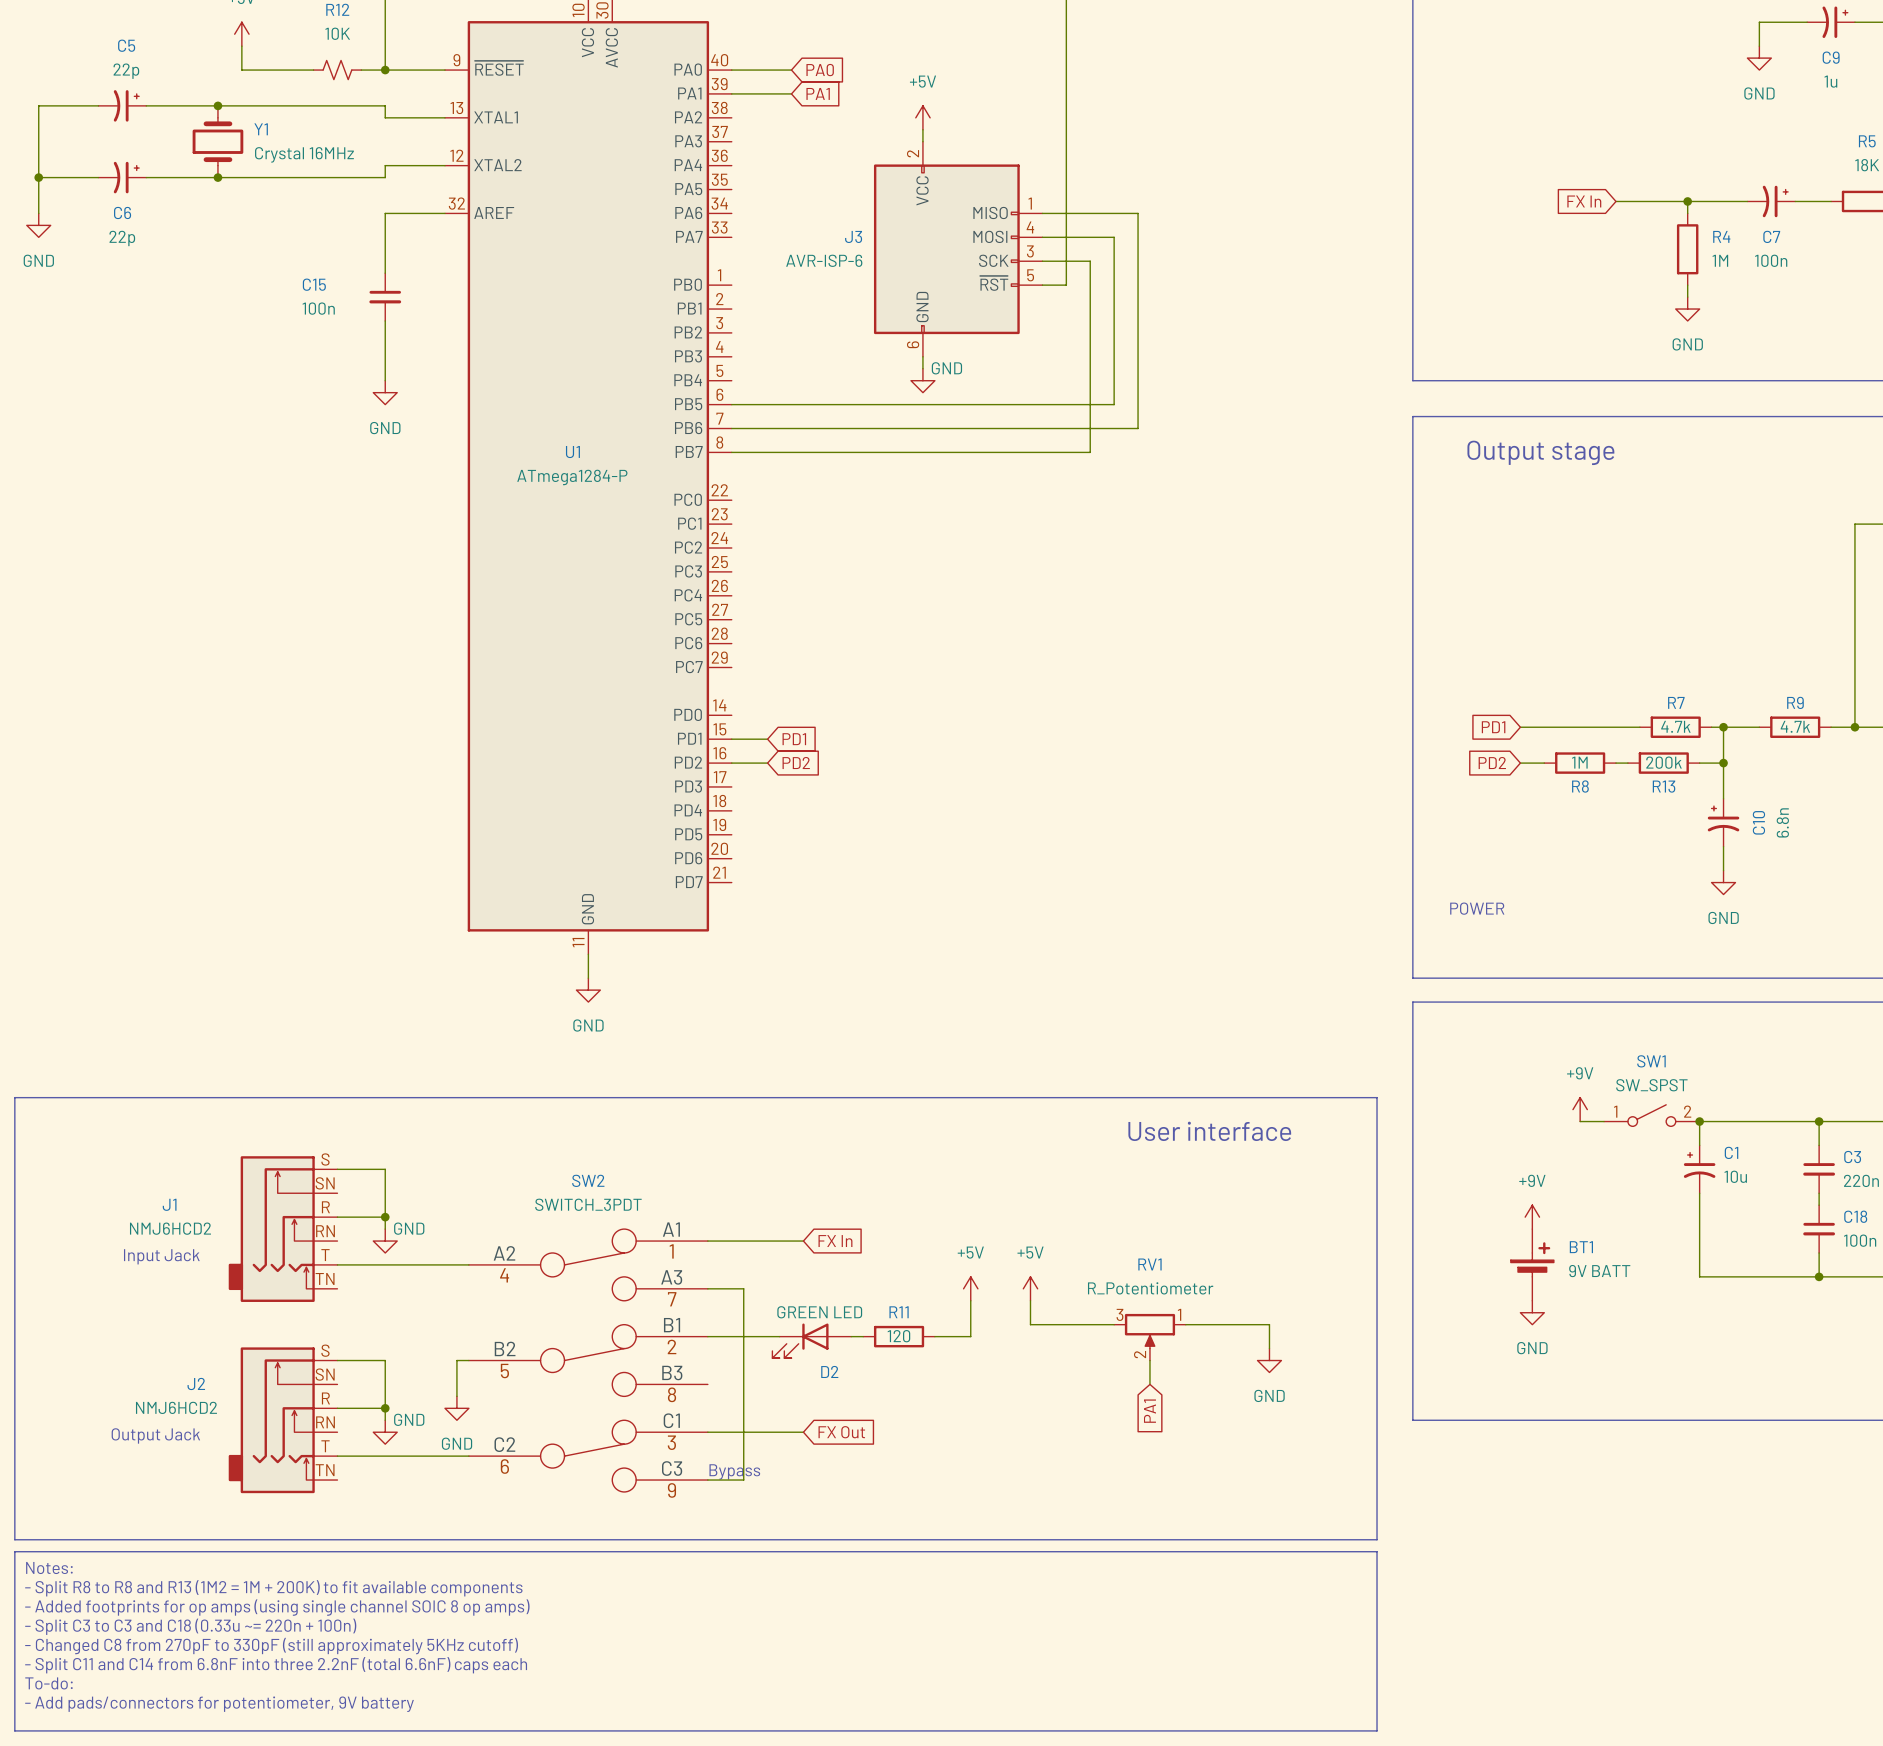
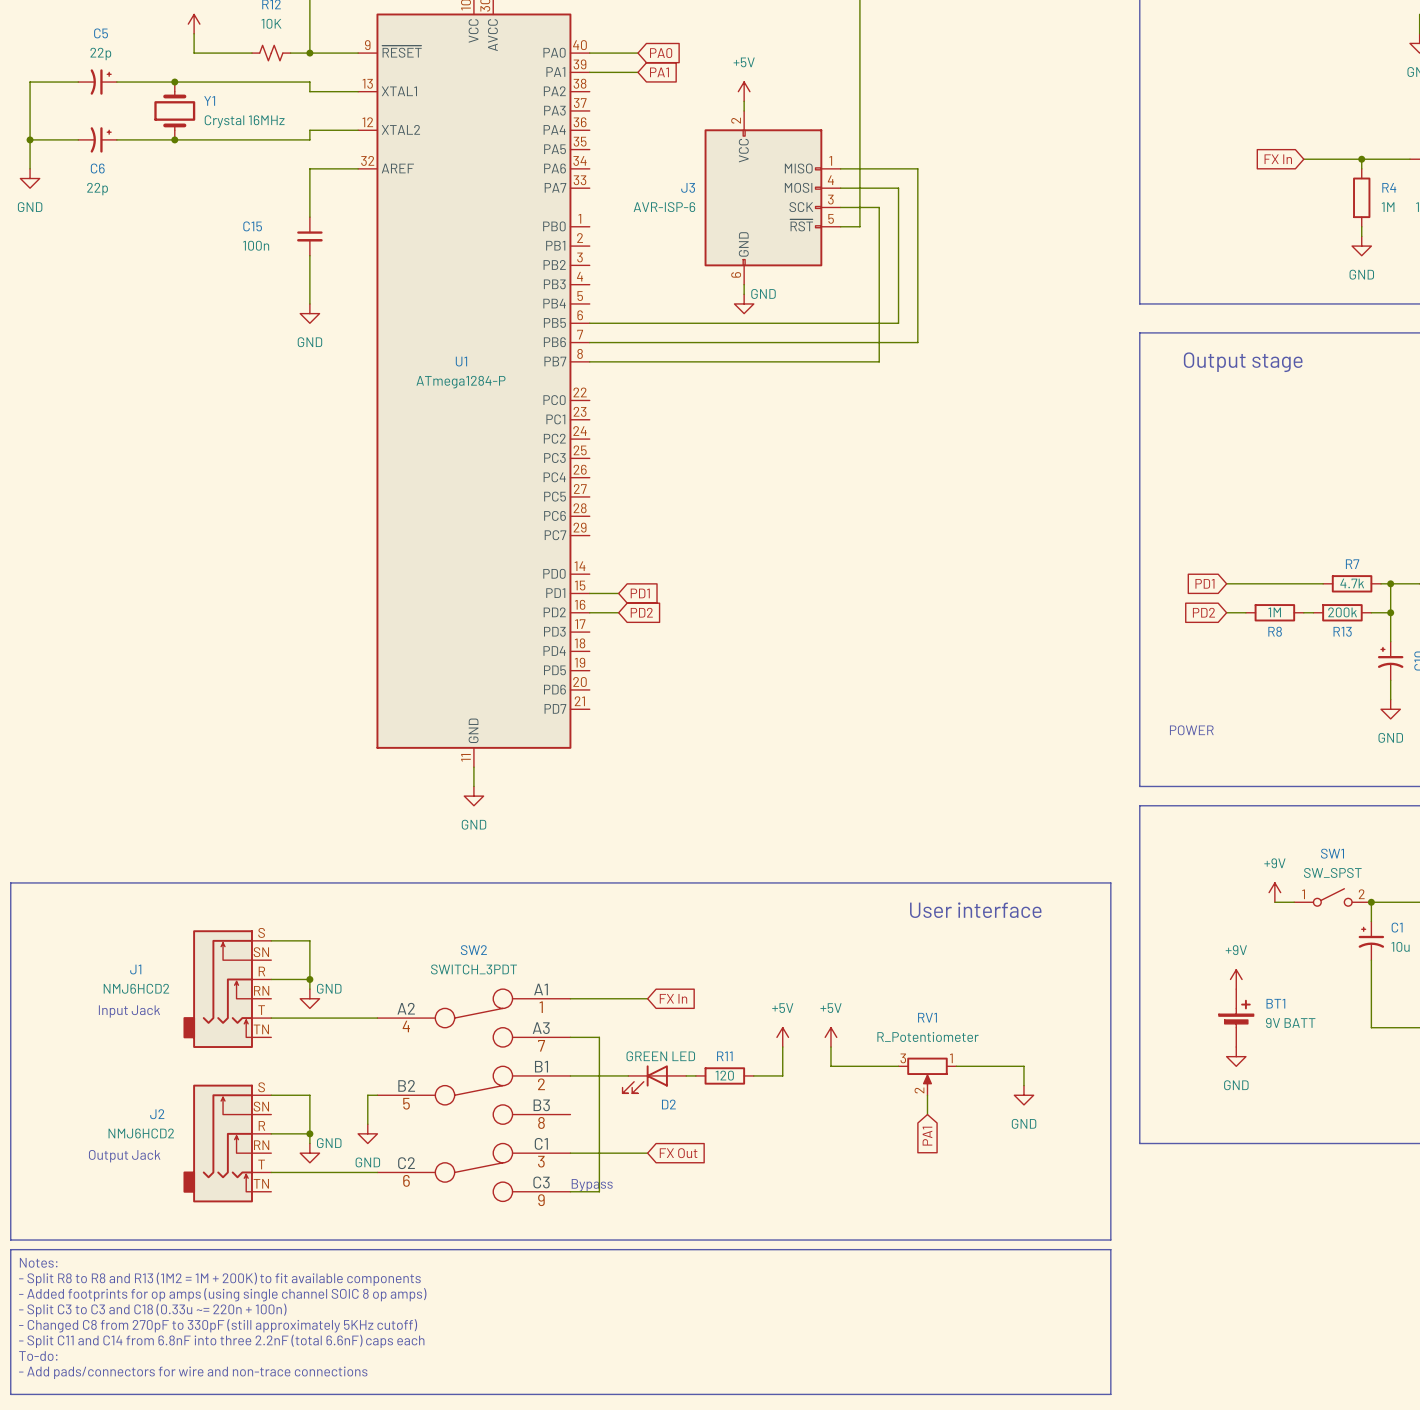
text: - Add pads/connectors for potentiometer, 9V battery (219, 1704) -> - Add pads/connectors for wire and non-trace connections (193, 1372)

